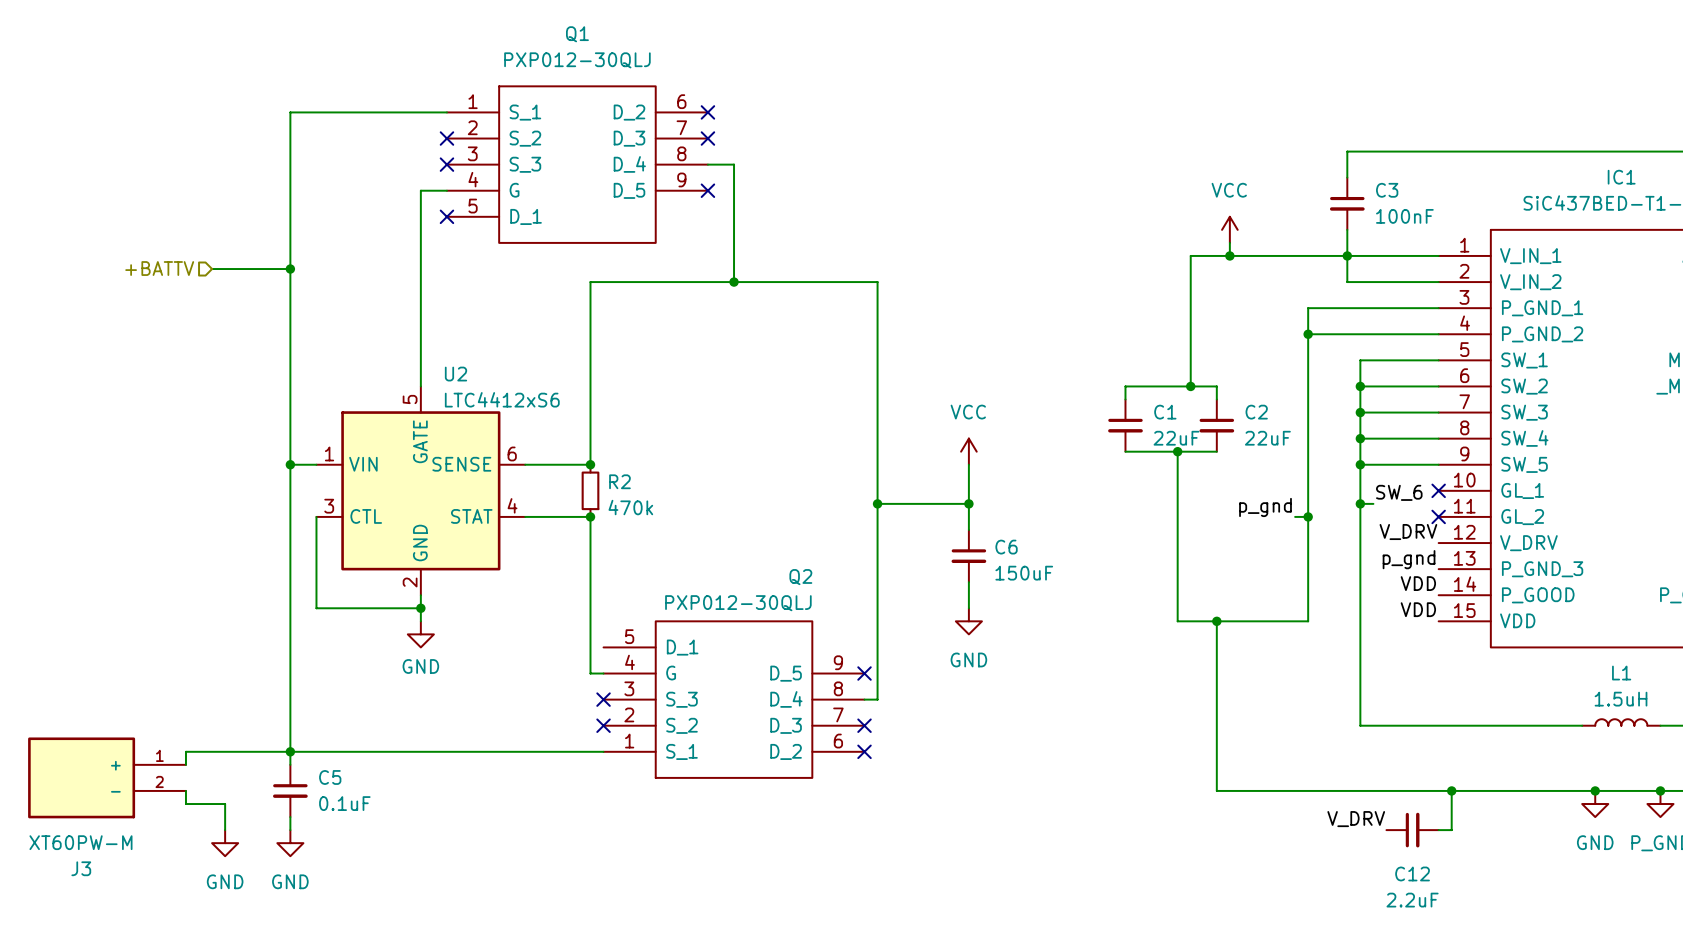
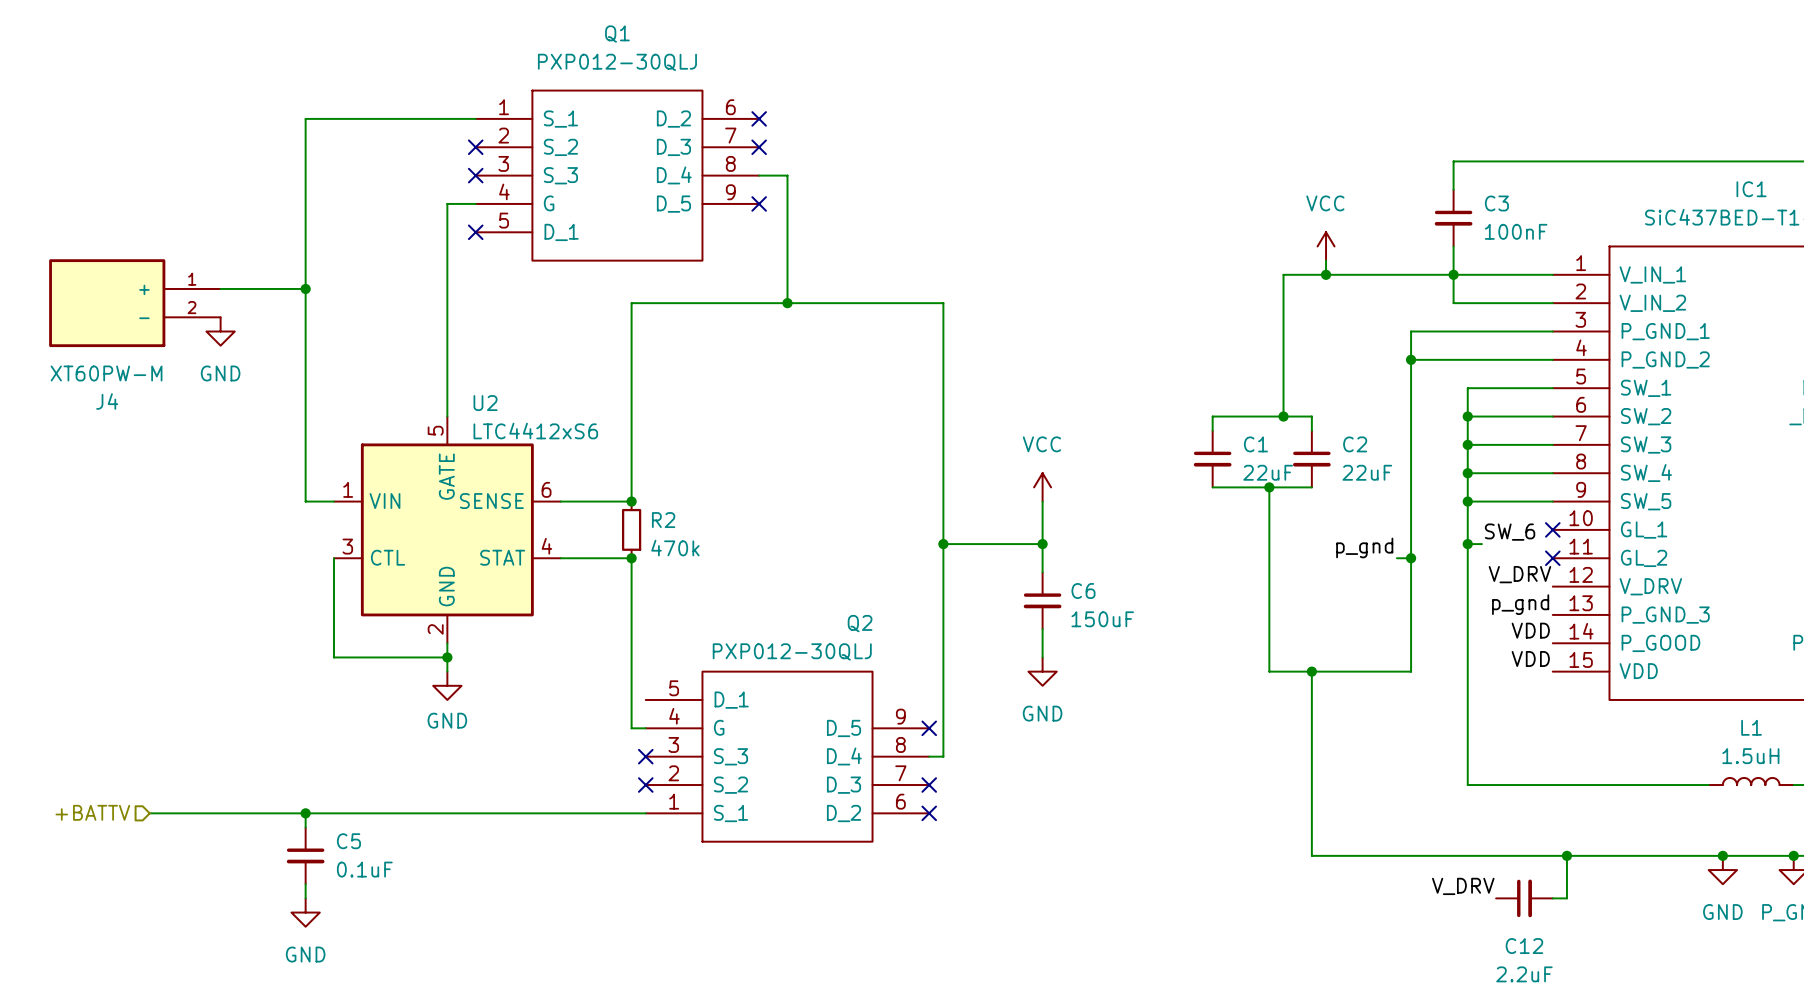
hierarchical label: +BATTV (159, 268) -> none
J4: none -> XT60PW-M (134, 303)
power symbol: none -> GND (220, 331)
wire: (290, 464) (290, 751) -> none
junction: (290, 464) -> none
hierarchical label: none -> +BATTV (92, 812)
wire: (185, 751) (185, 764) -> (192, 813) (149, 813)
J3: XT60PW-M (107, 777) -> none
wire: (185, 790) (185, 804) (225, 804) (225, 830) -> none
power symbol: GND (225, 843) -> none

